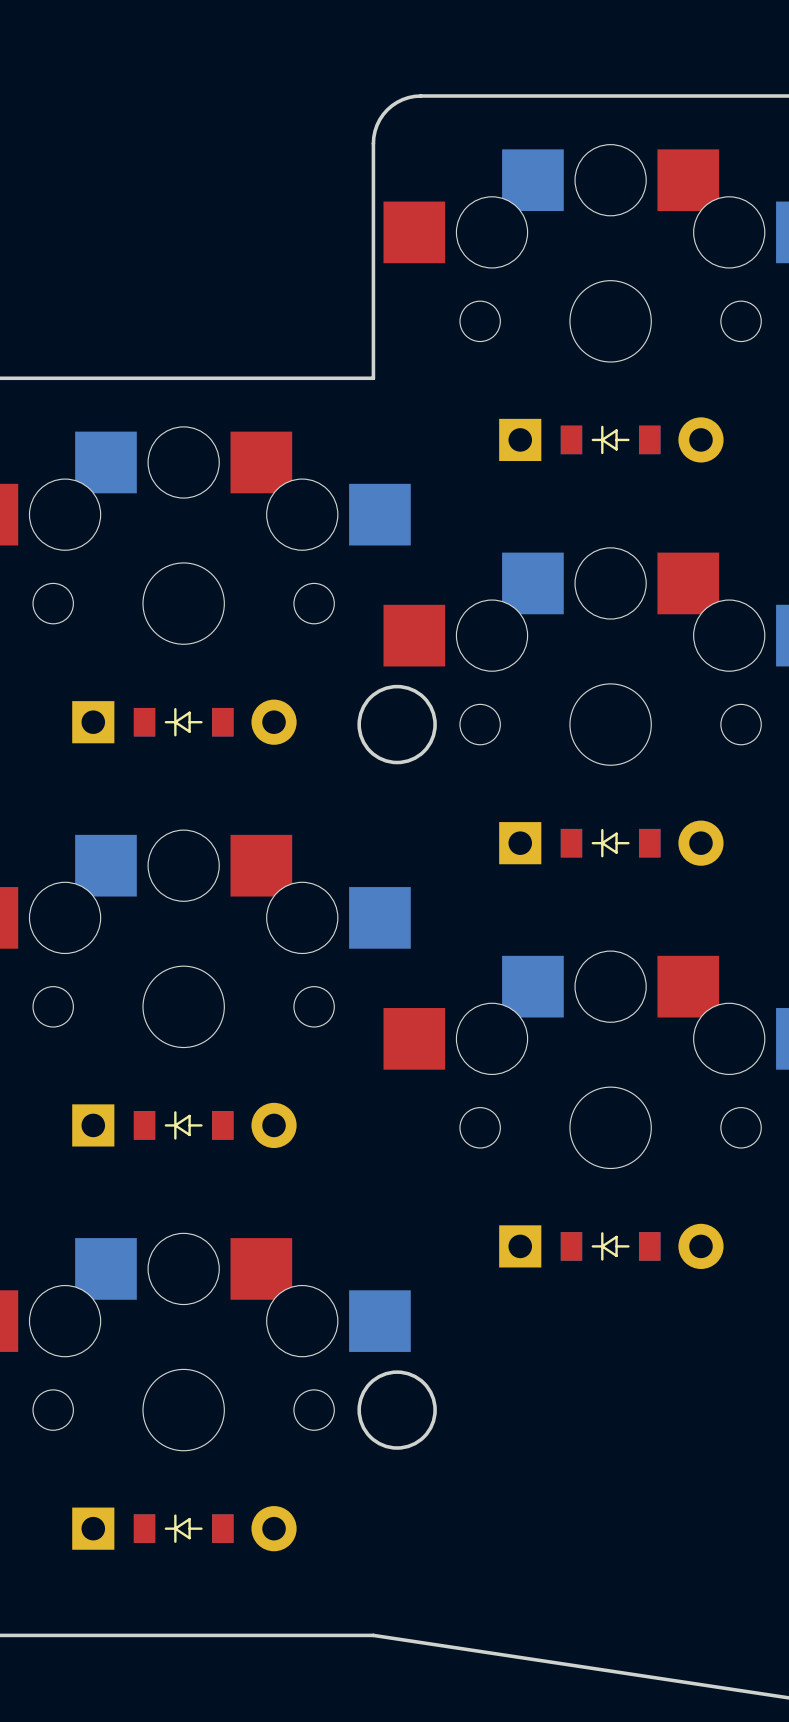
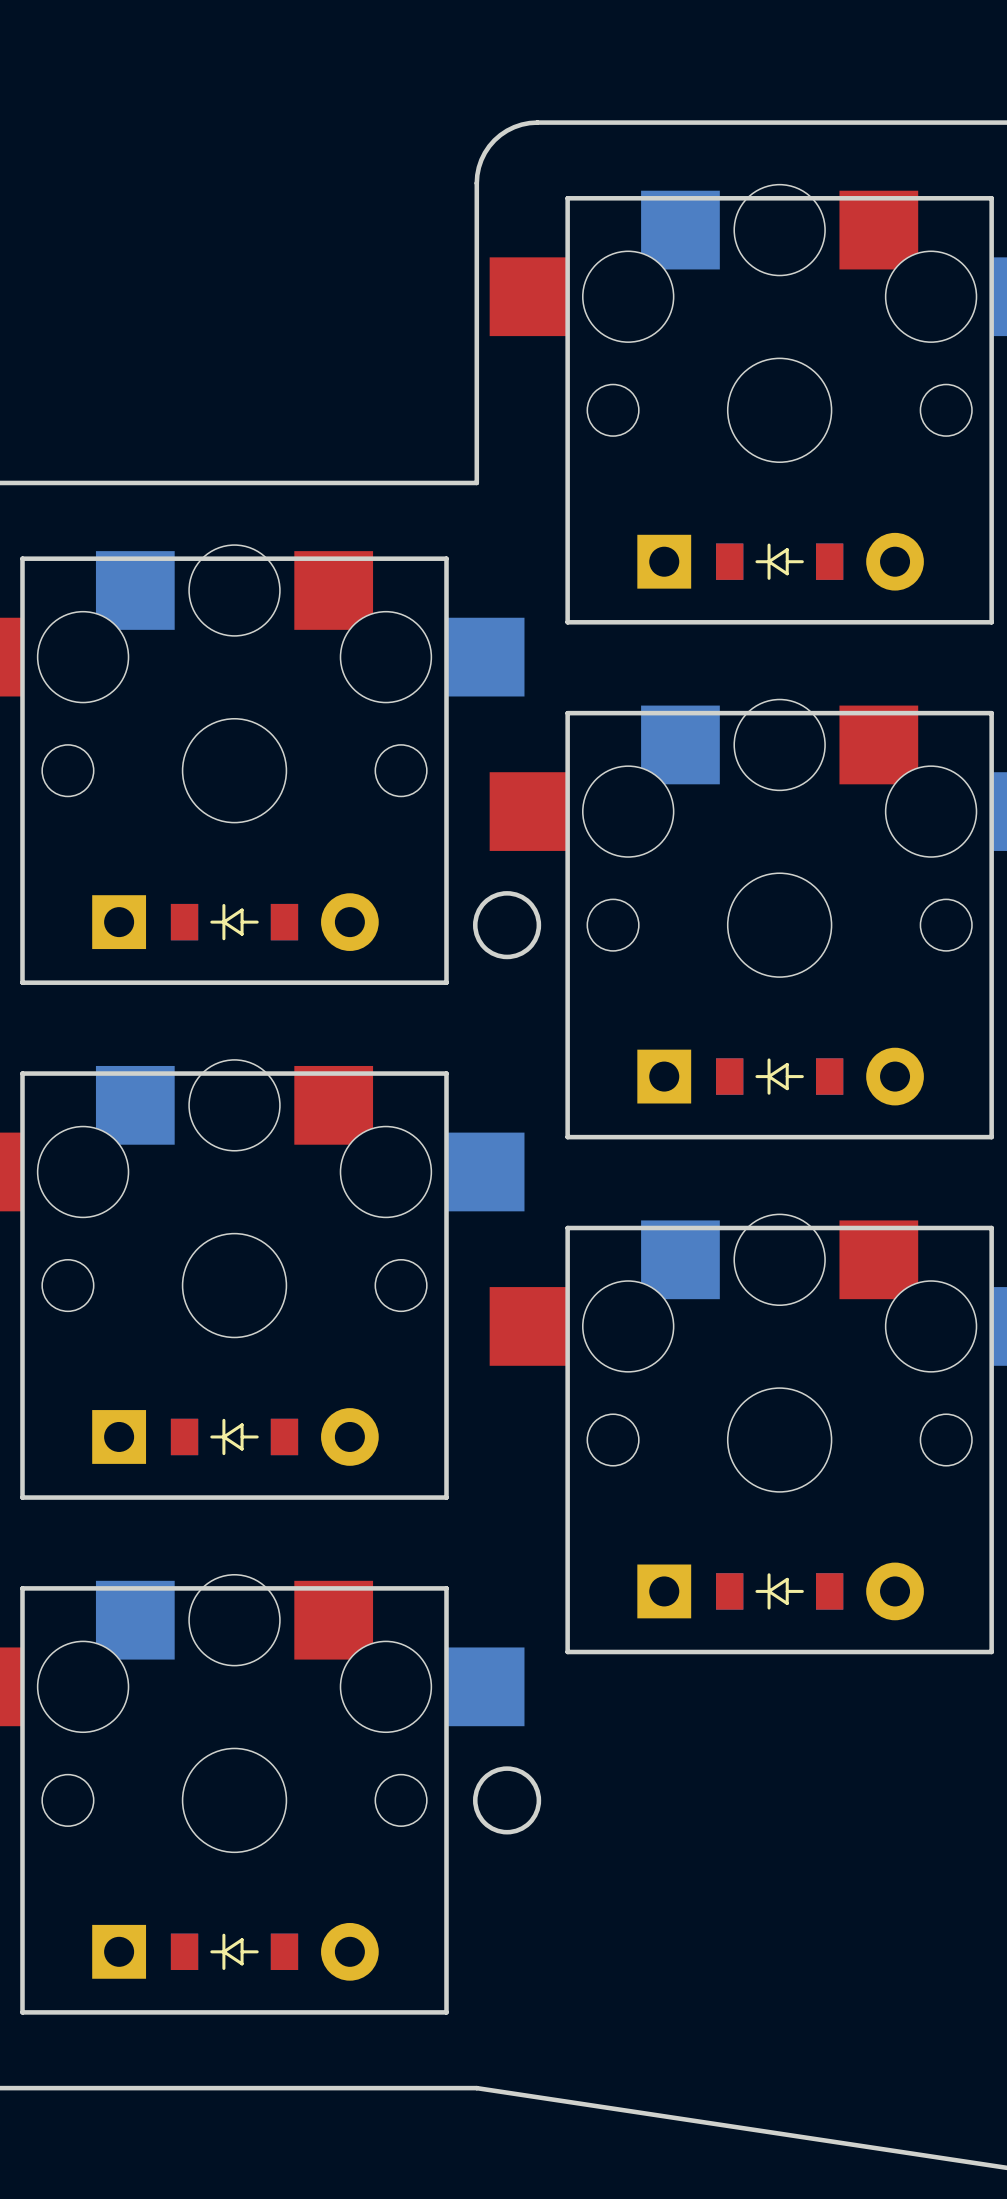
board edge: none -> (567, 198) (567, 622) (991, 622) (991, 198) (567, 198)
board edge: none -> (22, 558) (22, 982) (446, 982) (446, 558) (22, 558)
board edge: none -> (567, 713) (567, 1137) (991, 1137) (991, 713) (567, 713)
round board edge size: [357, 684, 437, 765] -> [473, 891, 542, 960]
board edge: none -> (22, 1073) (22, 1497) (446, 1497) (446, 1073) (22, 1073)
board edge: none -> (567, 1228) (991, 1228) (991, 1652) (567, 1652) (567, 1228)
board edge: none -> (22, 1588) (446, 1588) (446, 2012) (22, 2012) (22, 1588)
round board edge size: [357, 1370, 437, 1450] -> [473, 1766, 542, 1835]

